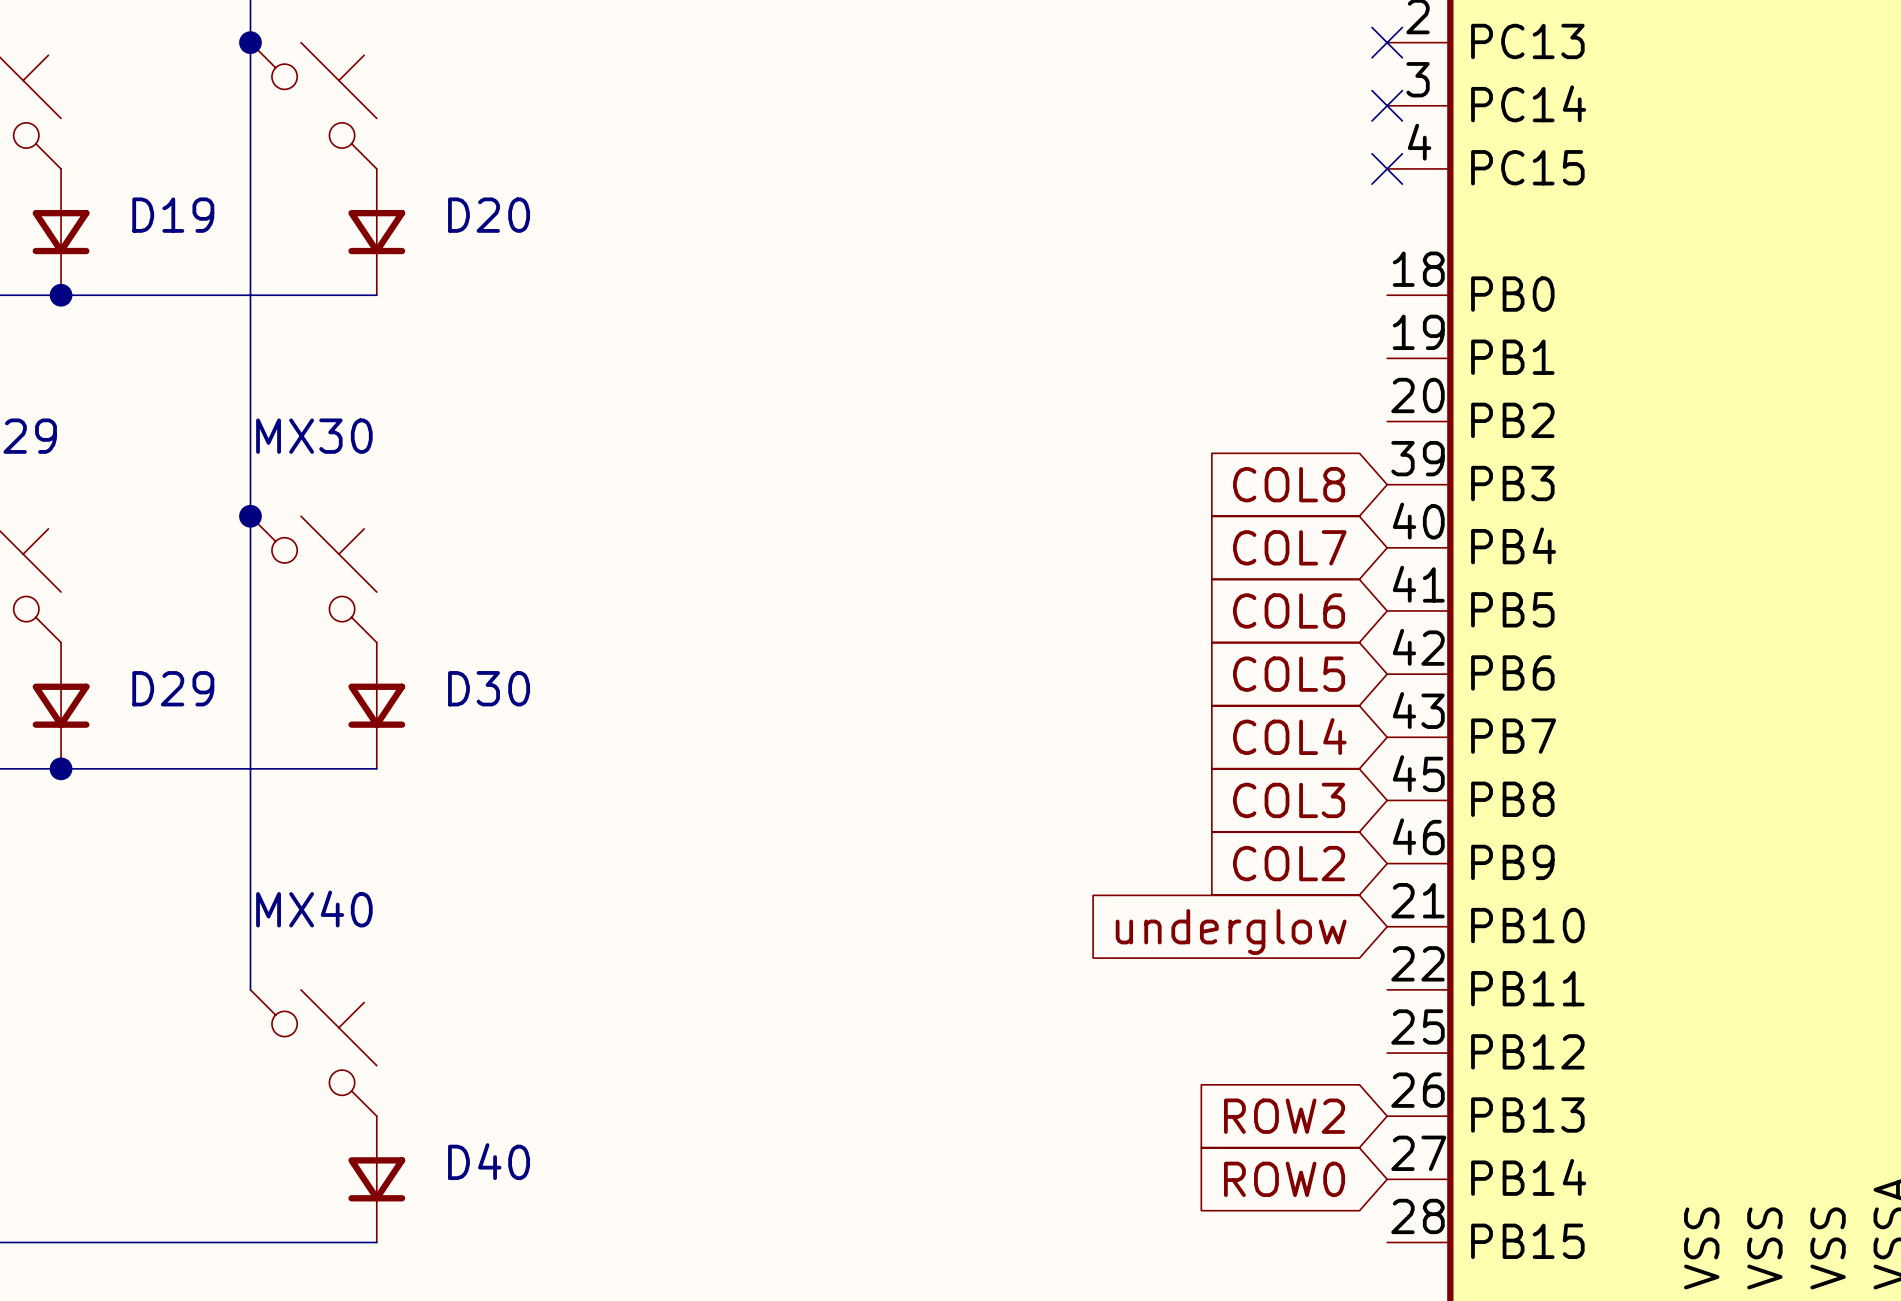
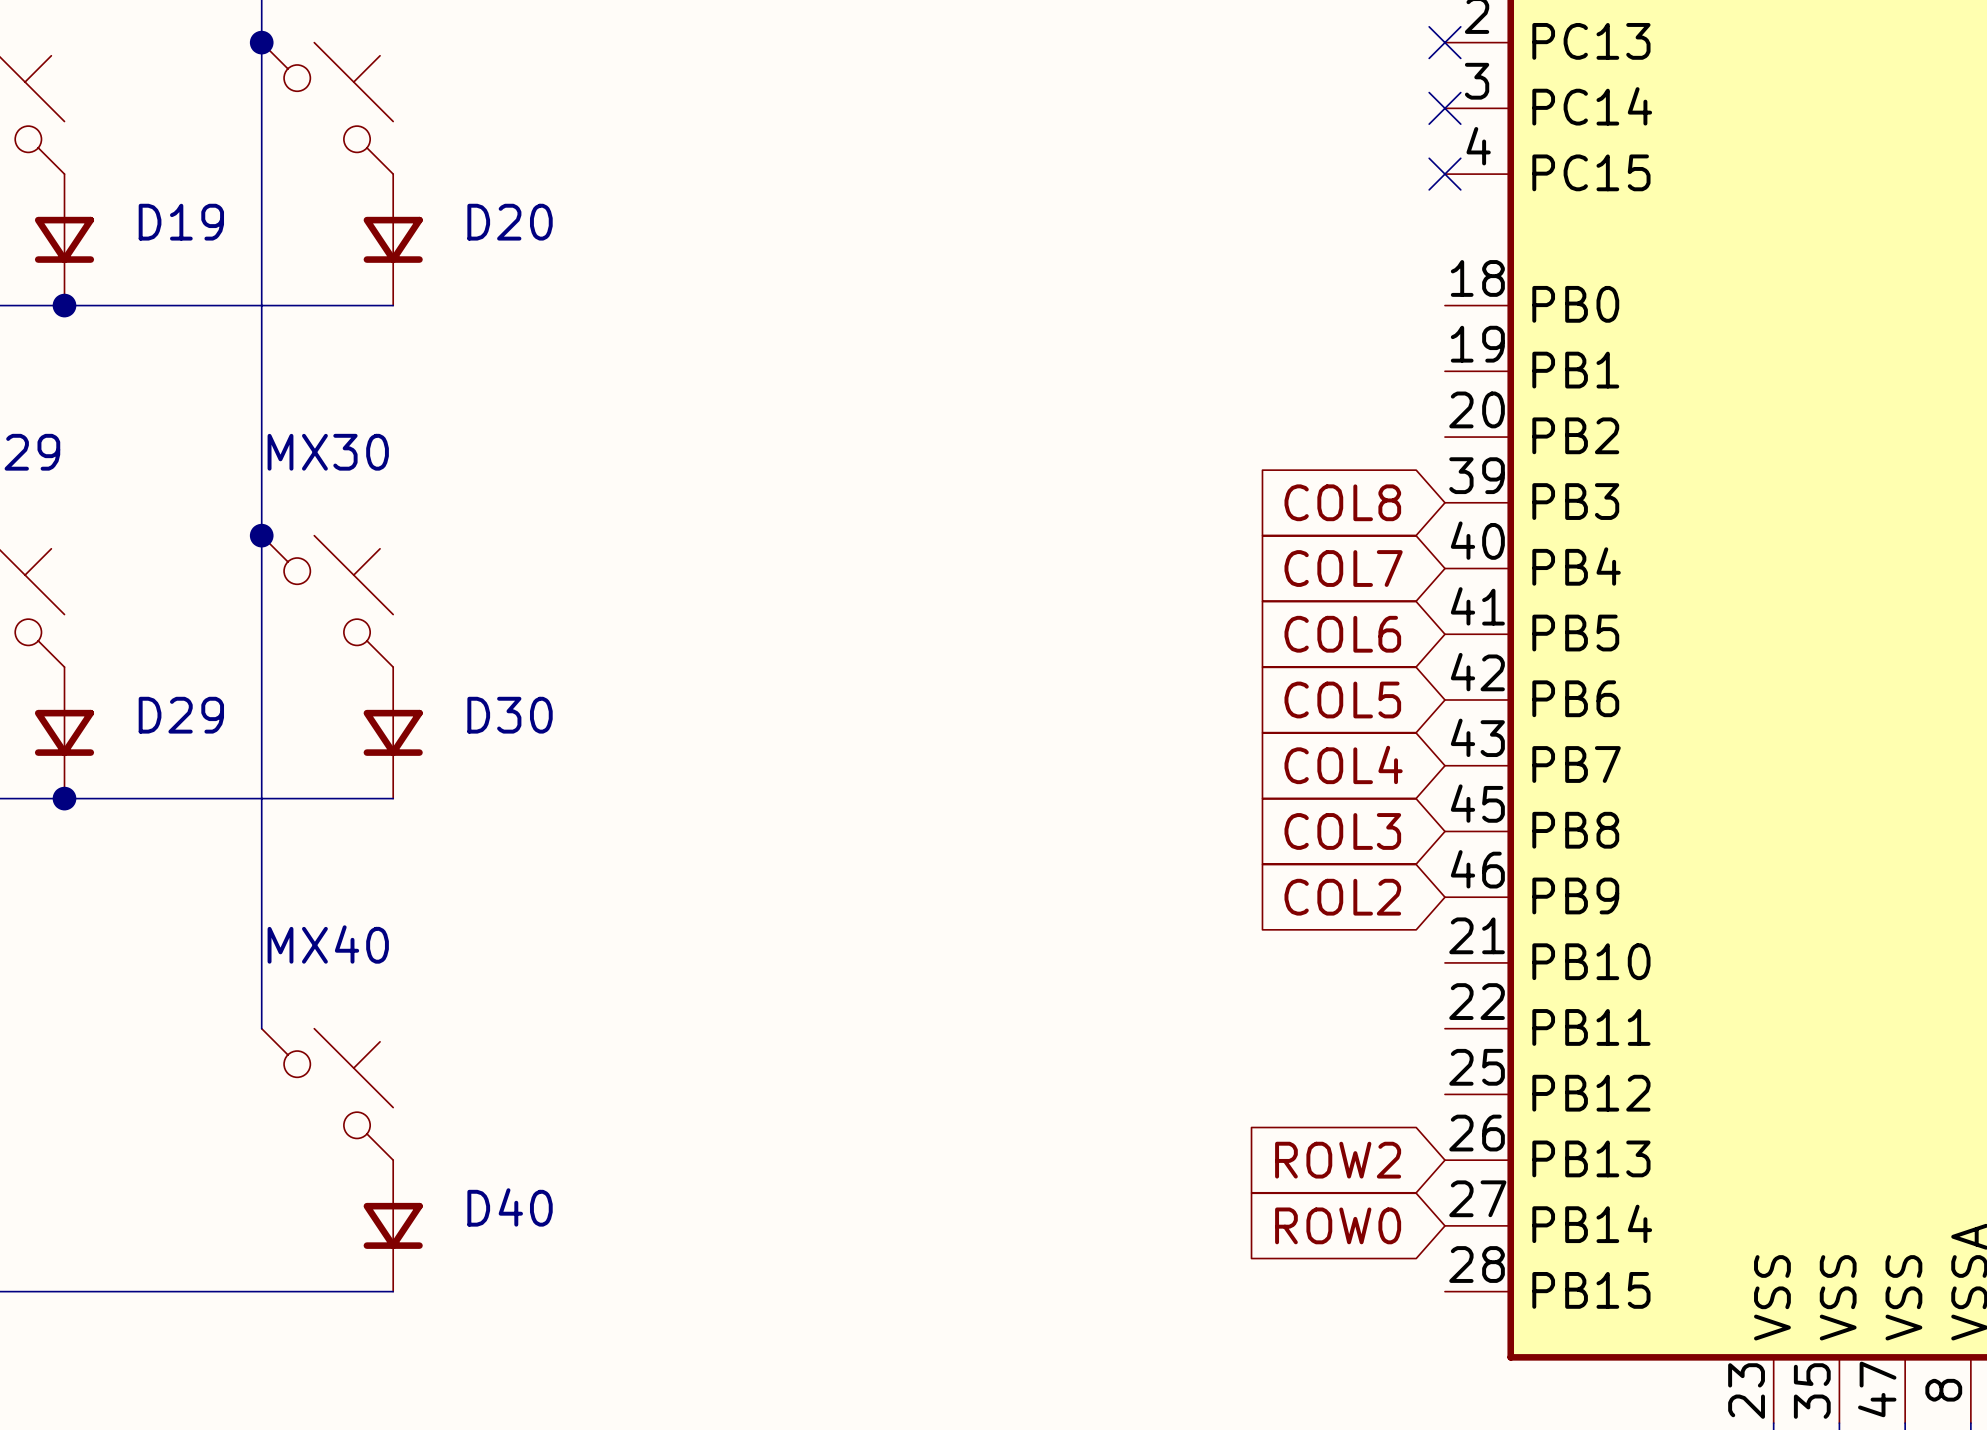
global label: underglow (1231, 932) -> none

